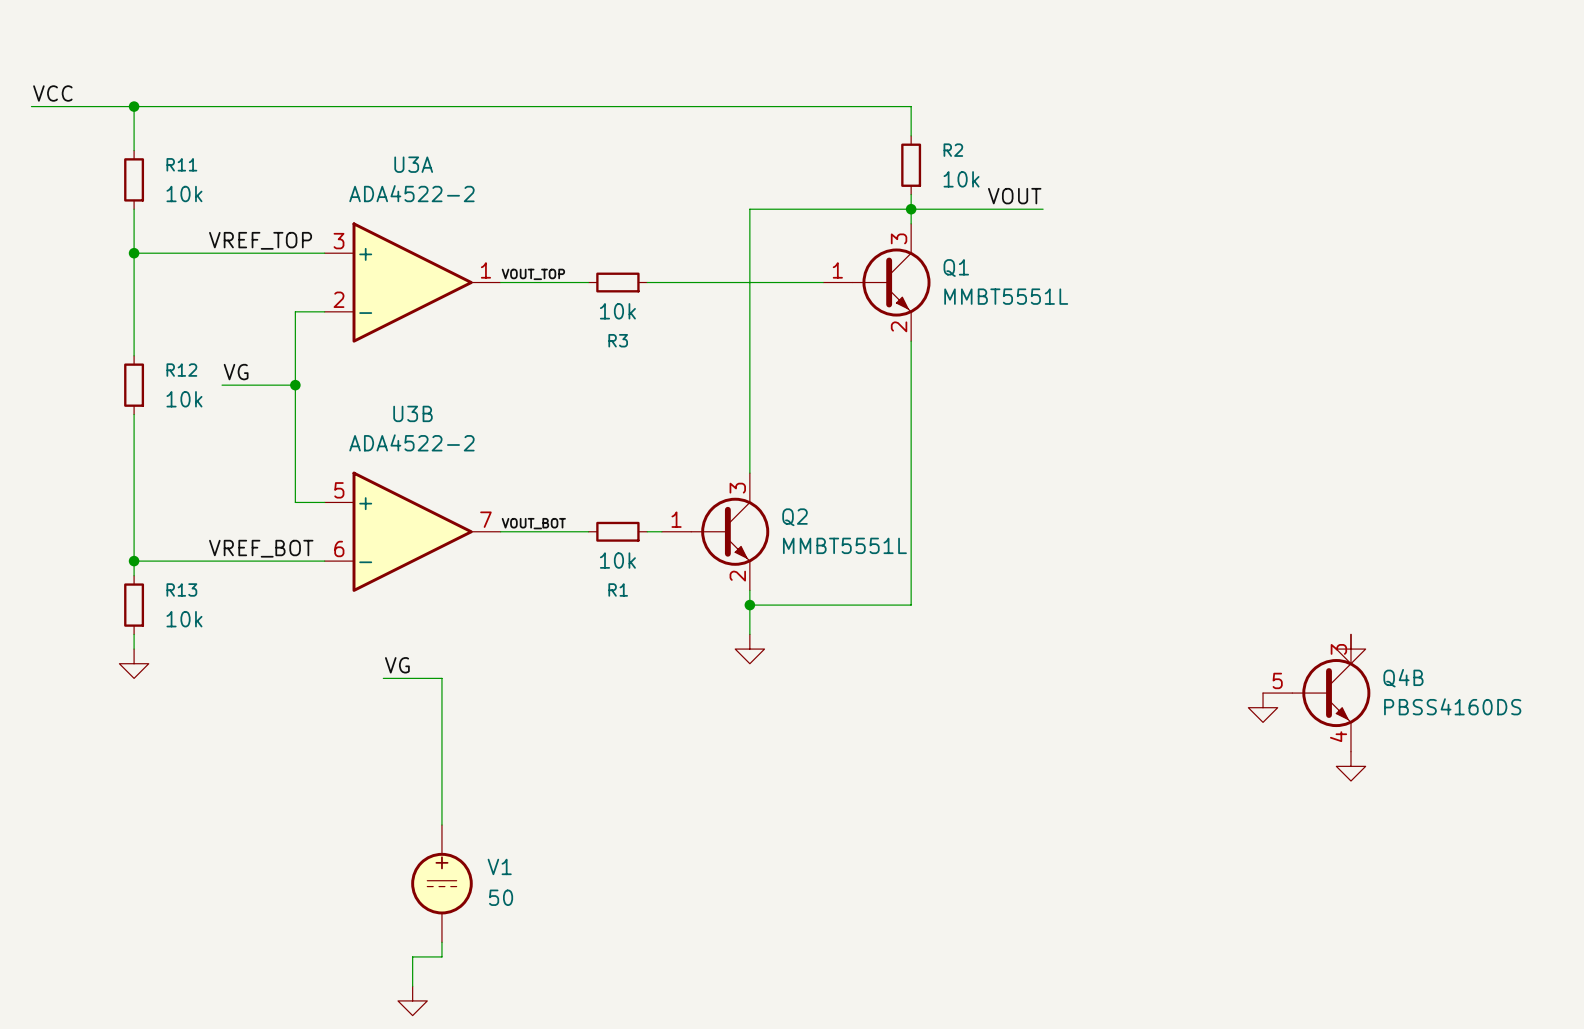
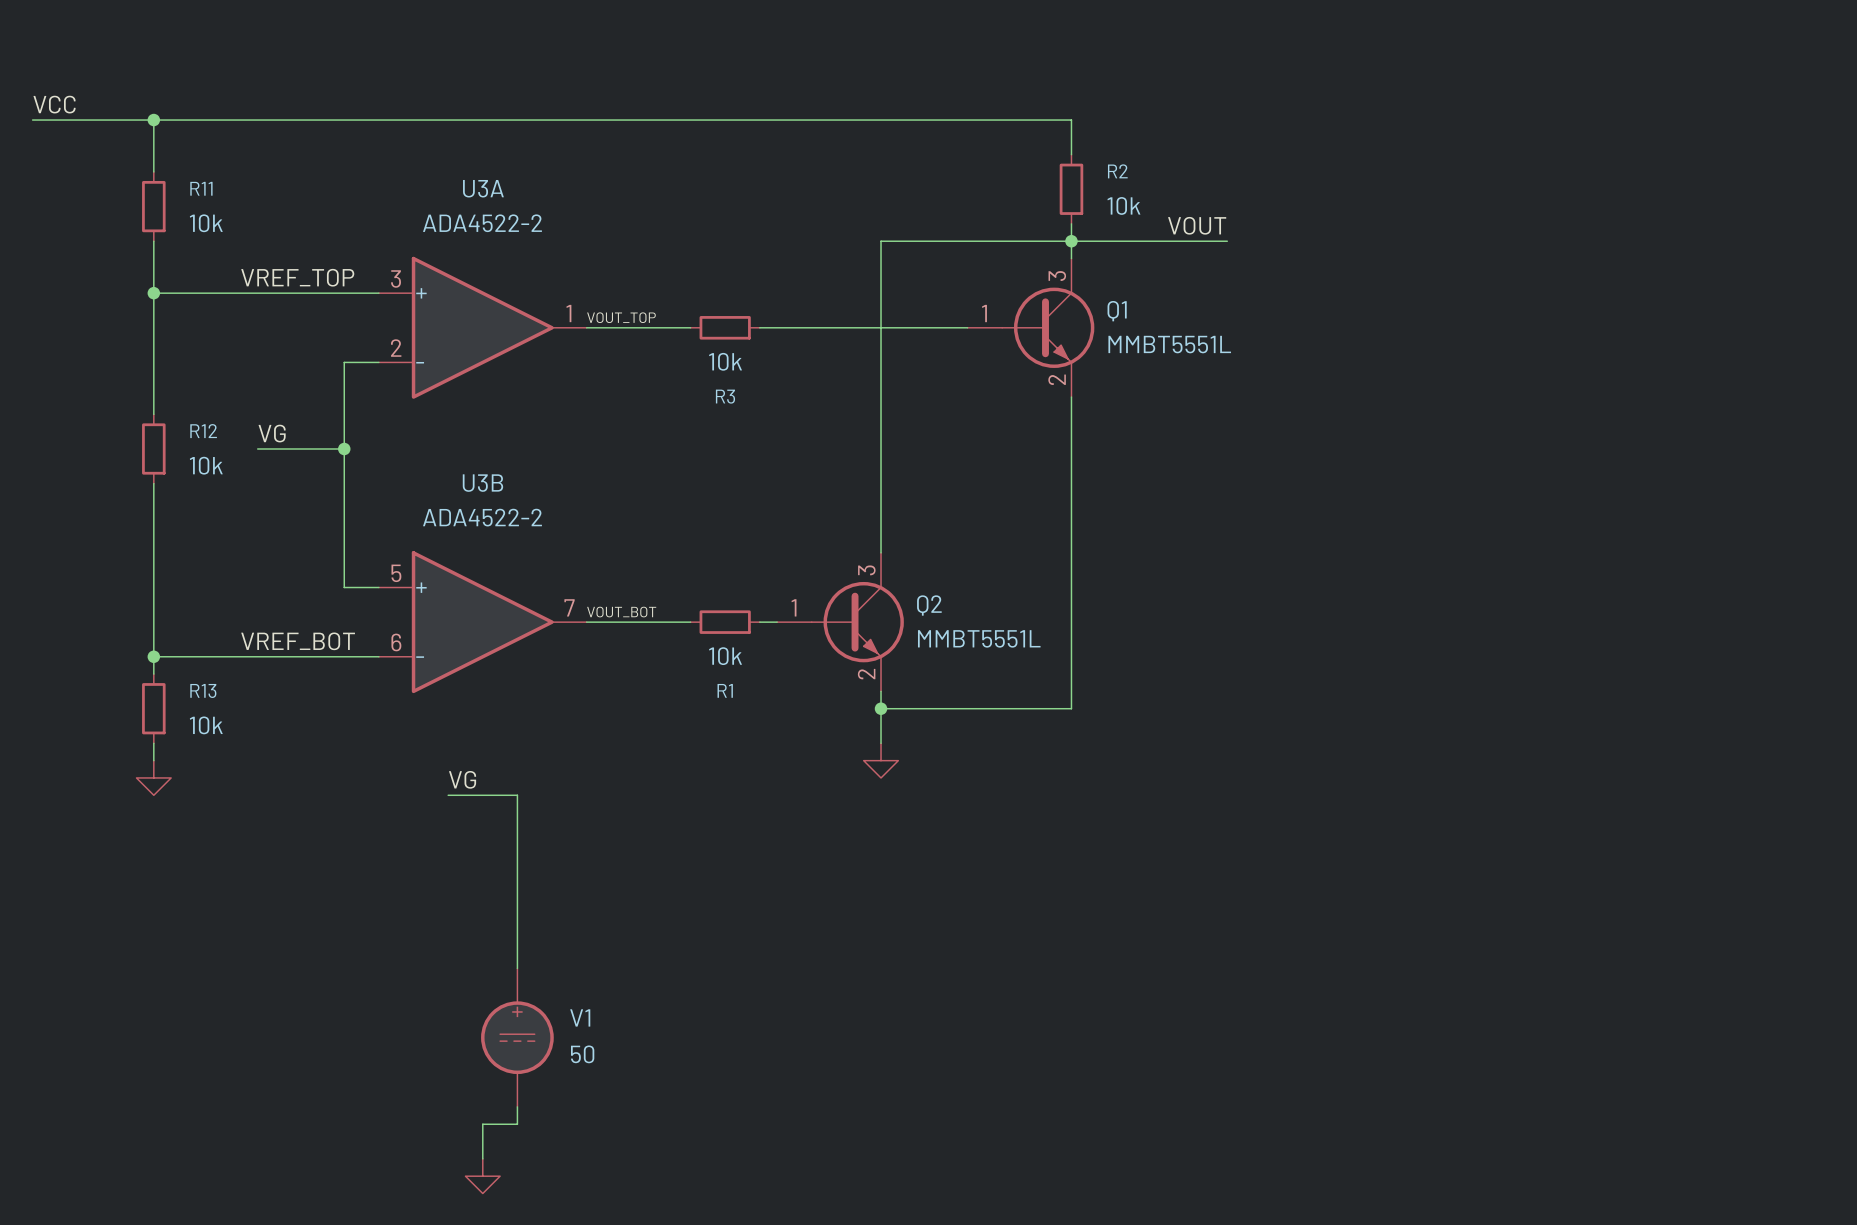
power symbol: (1350, 649) -> none
Q4B: PBSS4160DS (1316, 693) -> none
power symbol: (1263, 707) -> none
power symbol: (1350, 766) -> none

